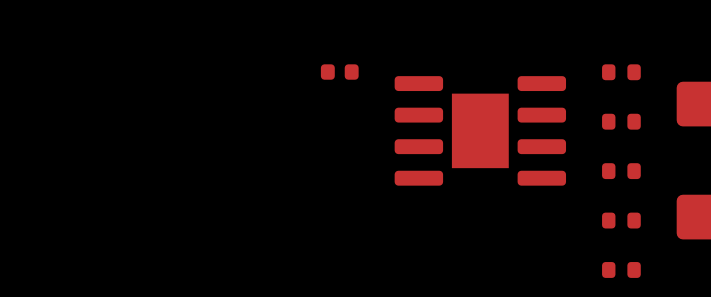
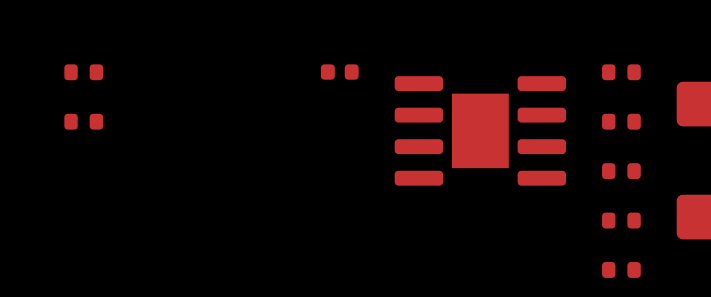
part: none -> (83, 72)
part: none -> (83, 121)

